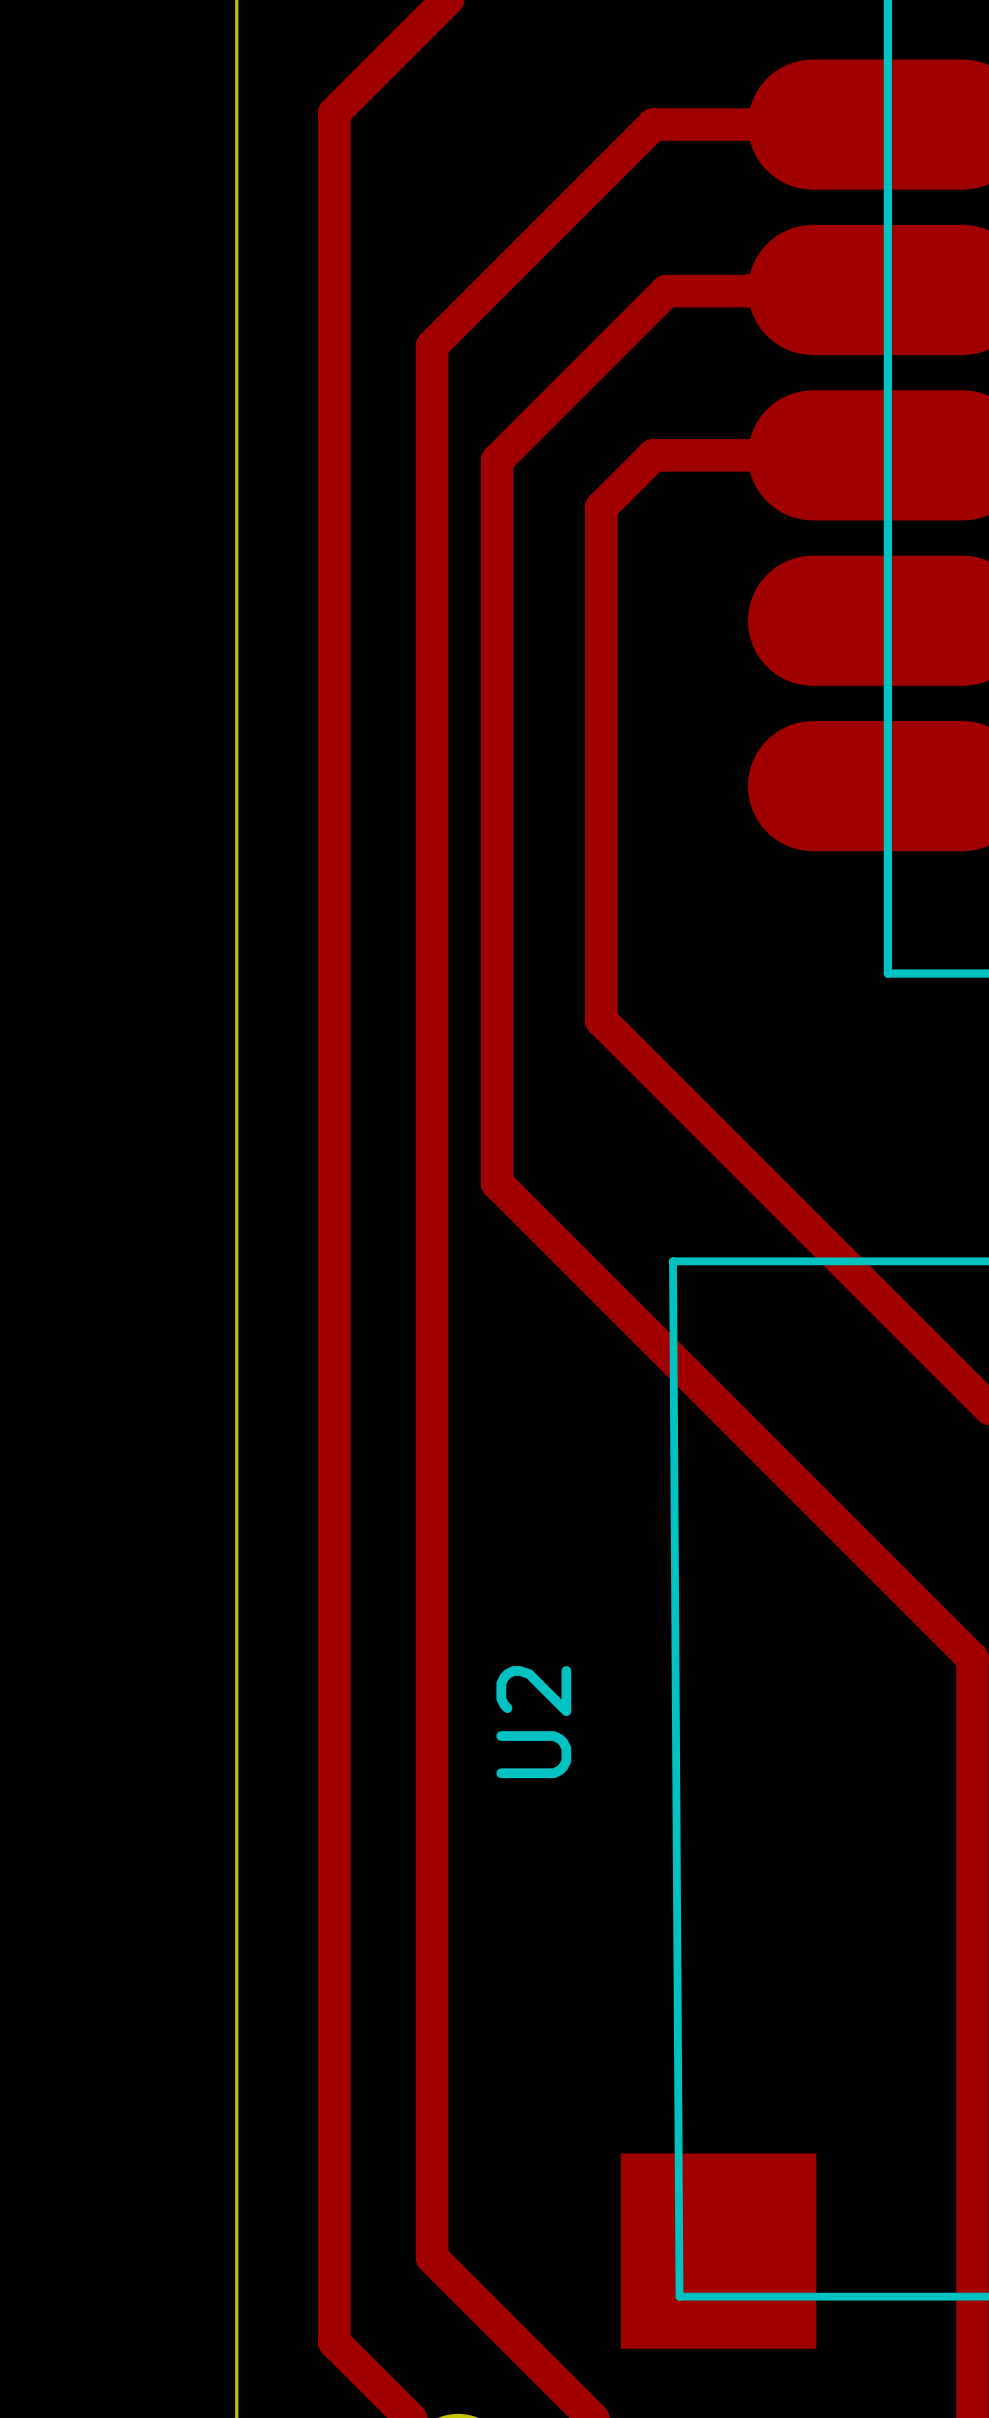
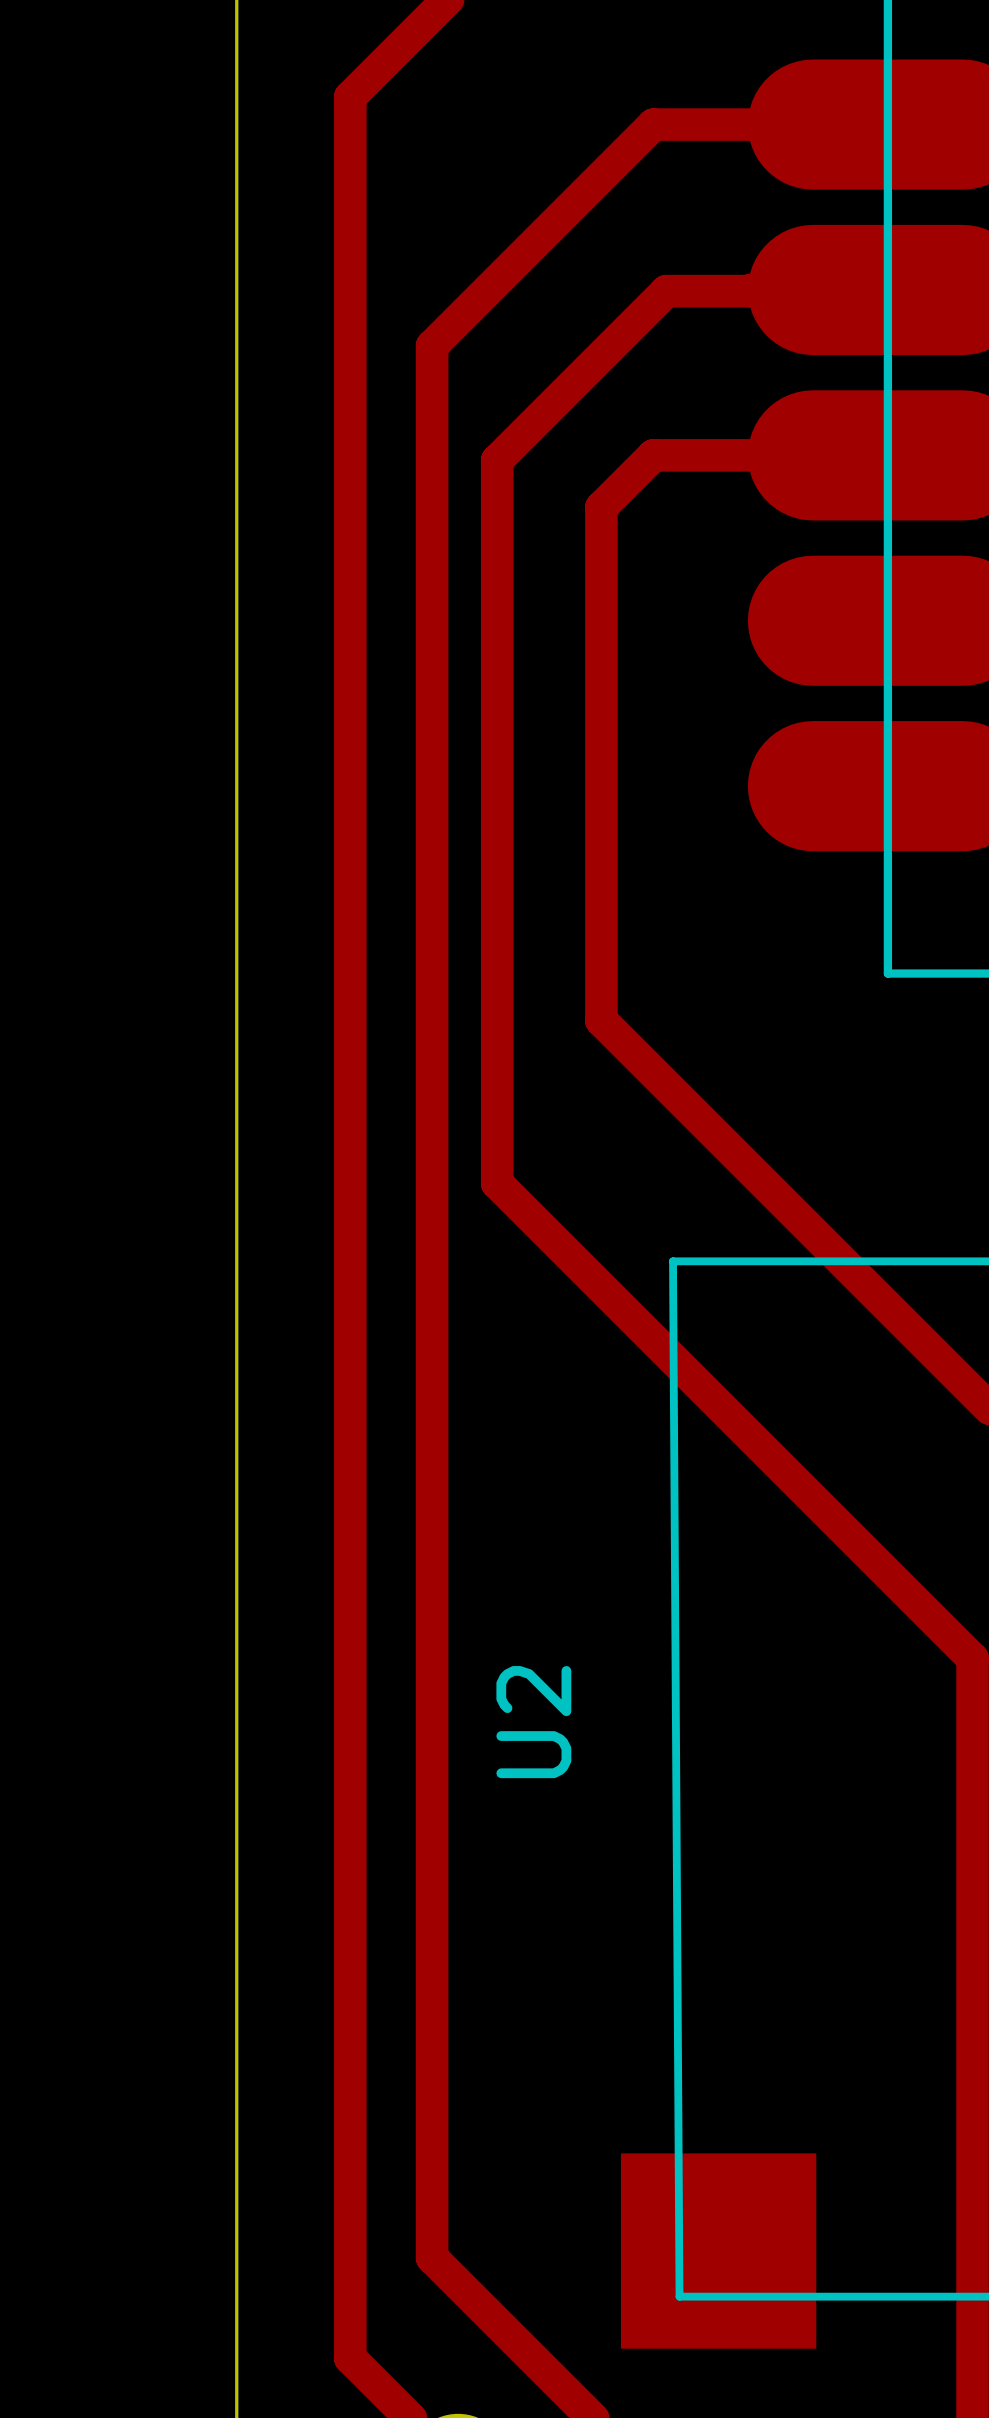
track: (350, 96) (334, 112) (334, 2342) (350, 2358) -> (350, 96) (350, 2358)

